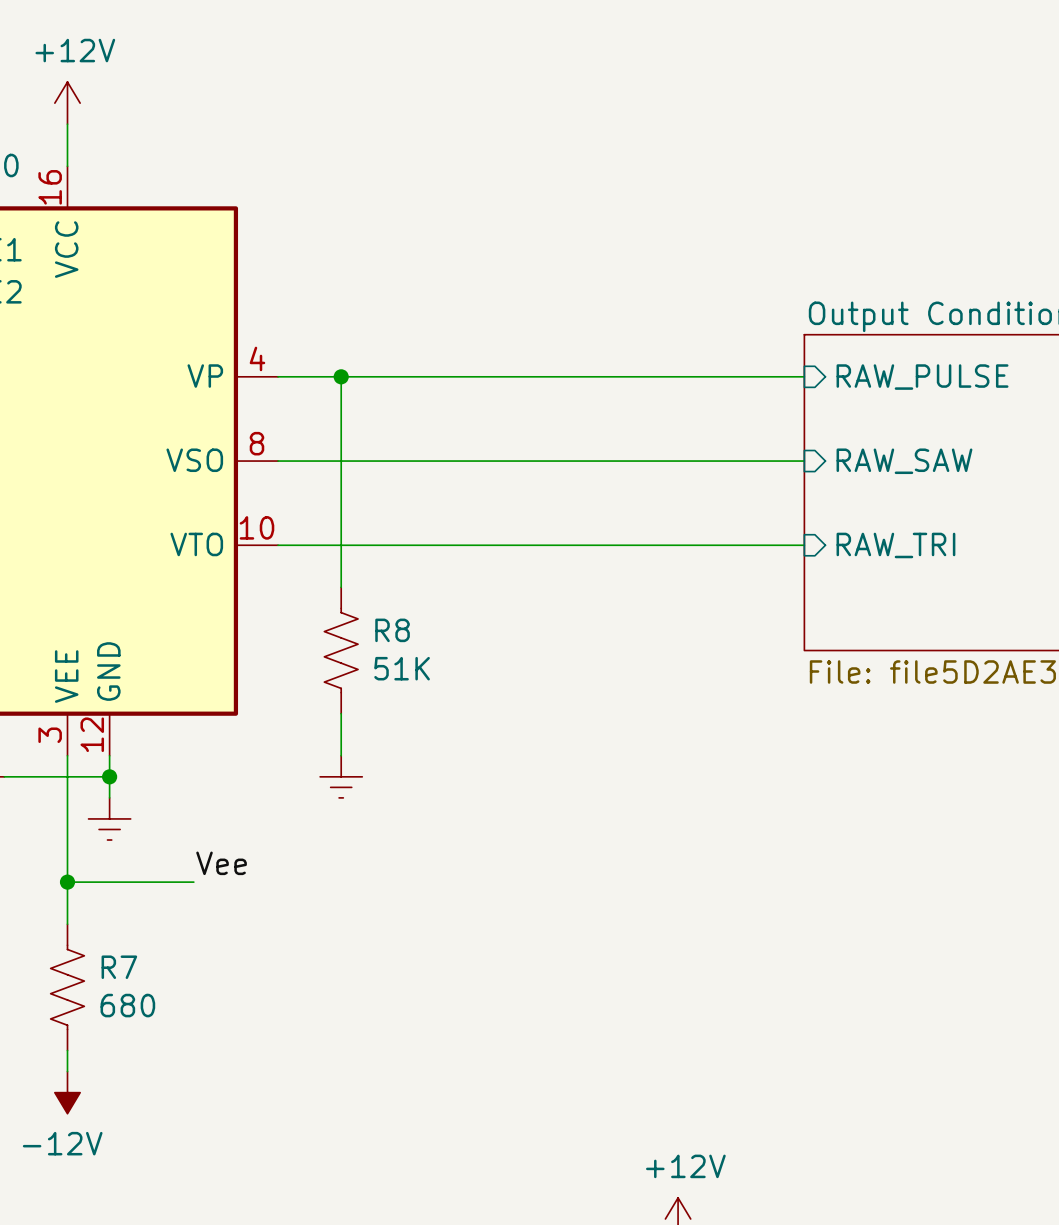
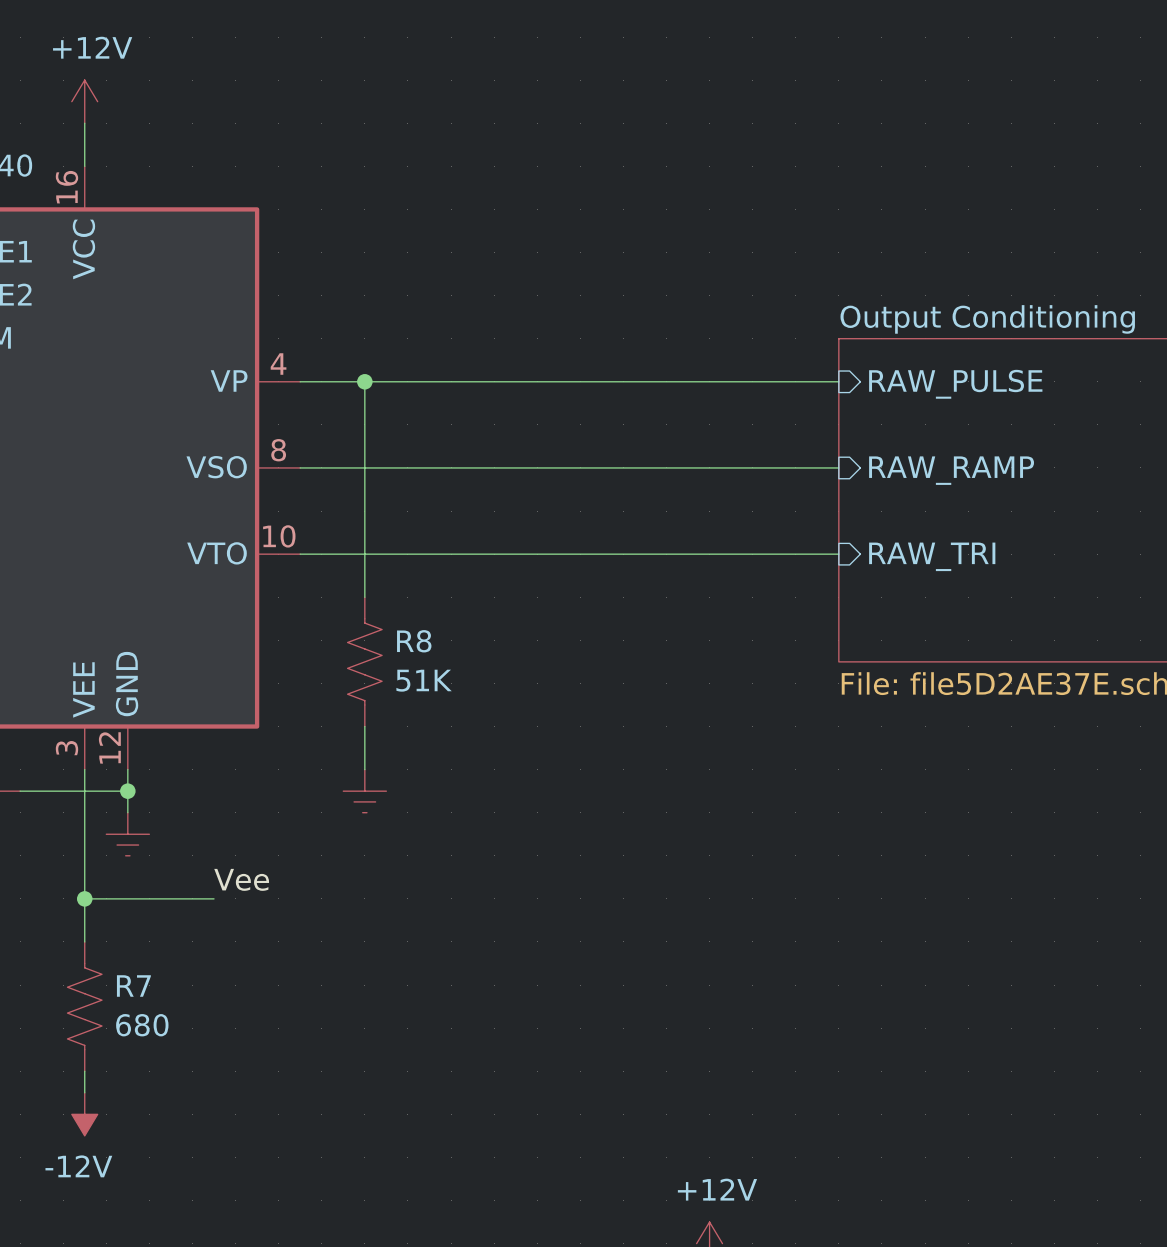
sheet pin: RAW_SAW (904, 461) -> RAW_RAMP (951, 470)

